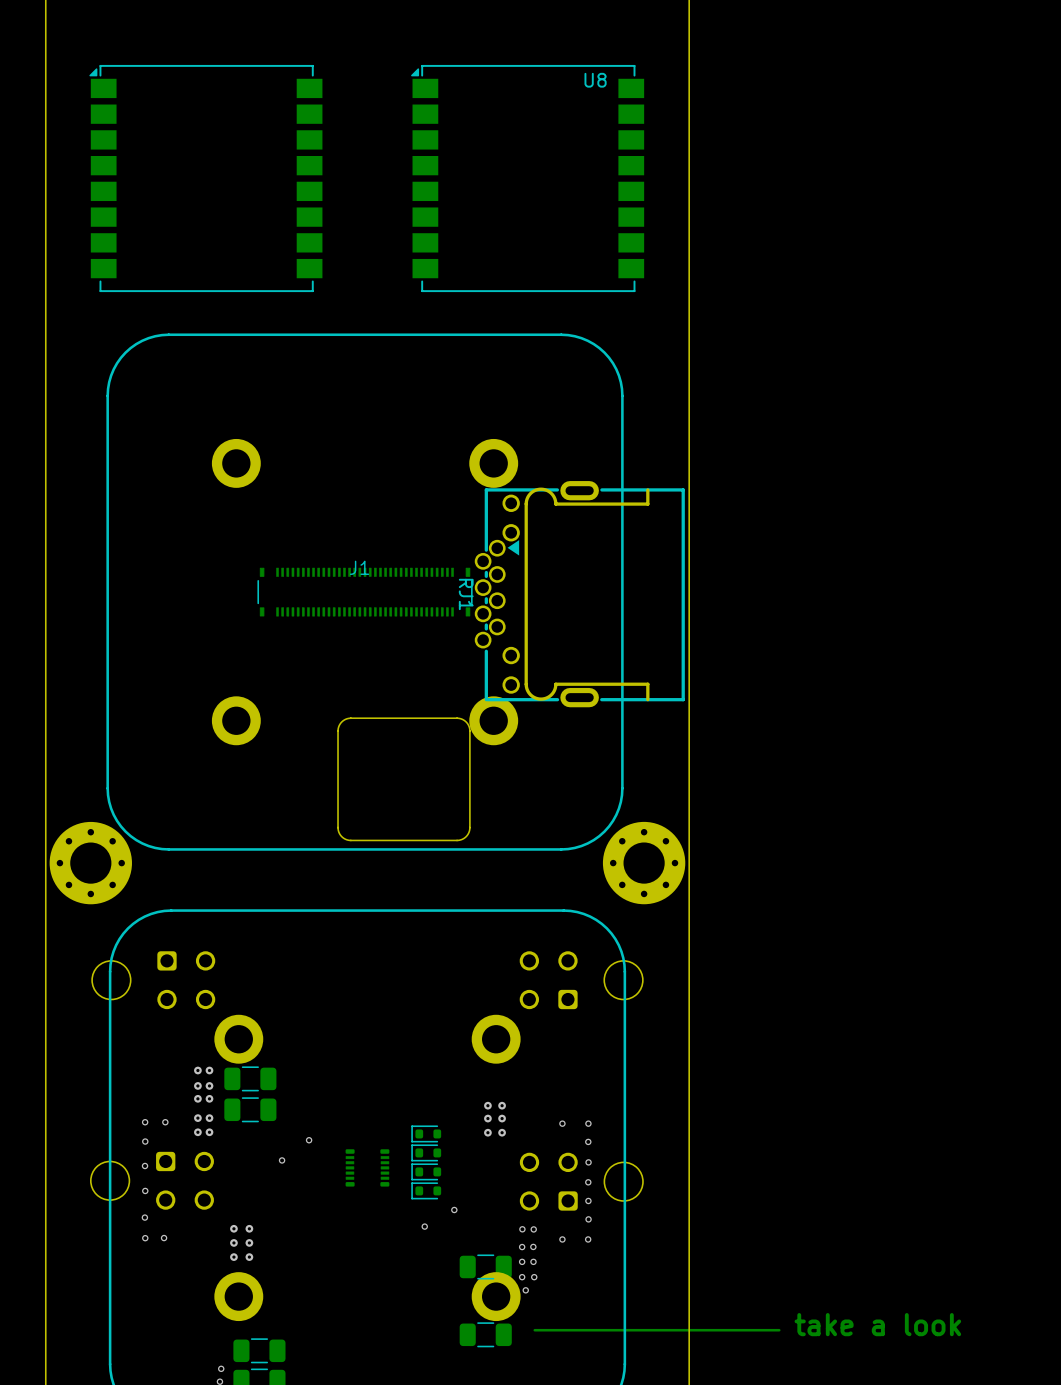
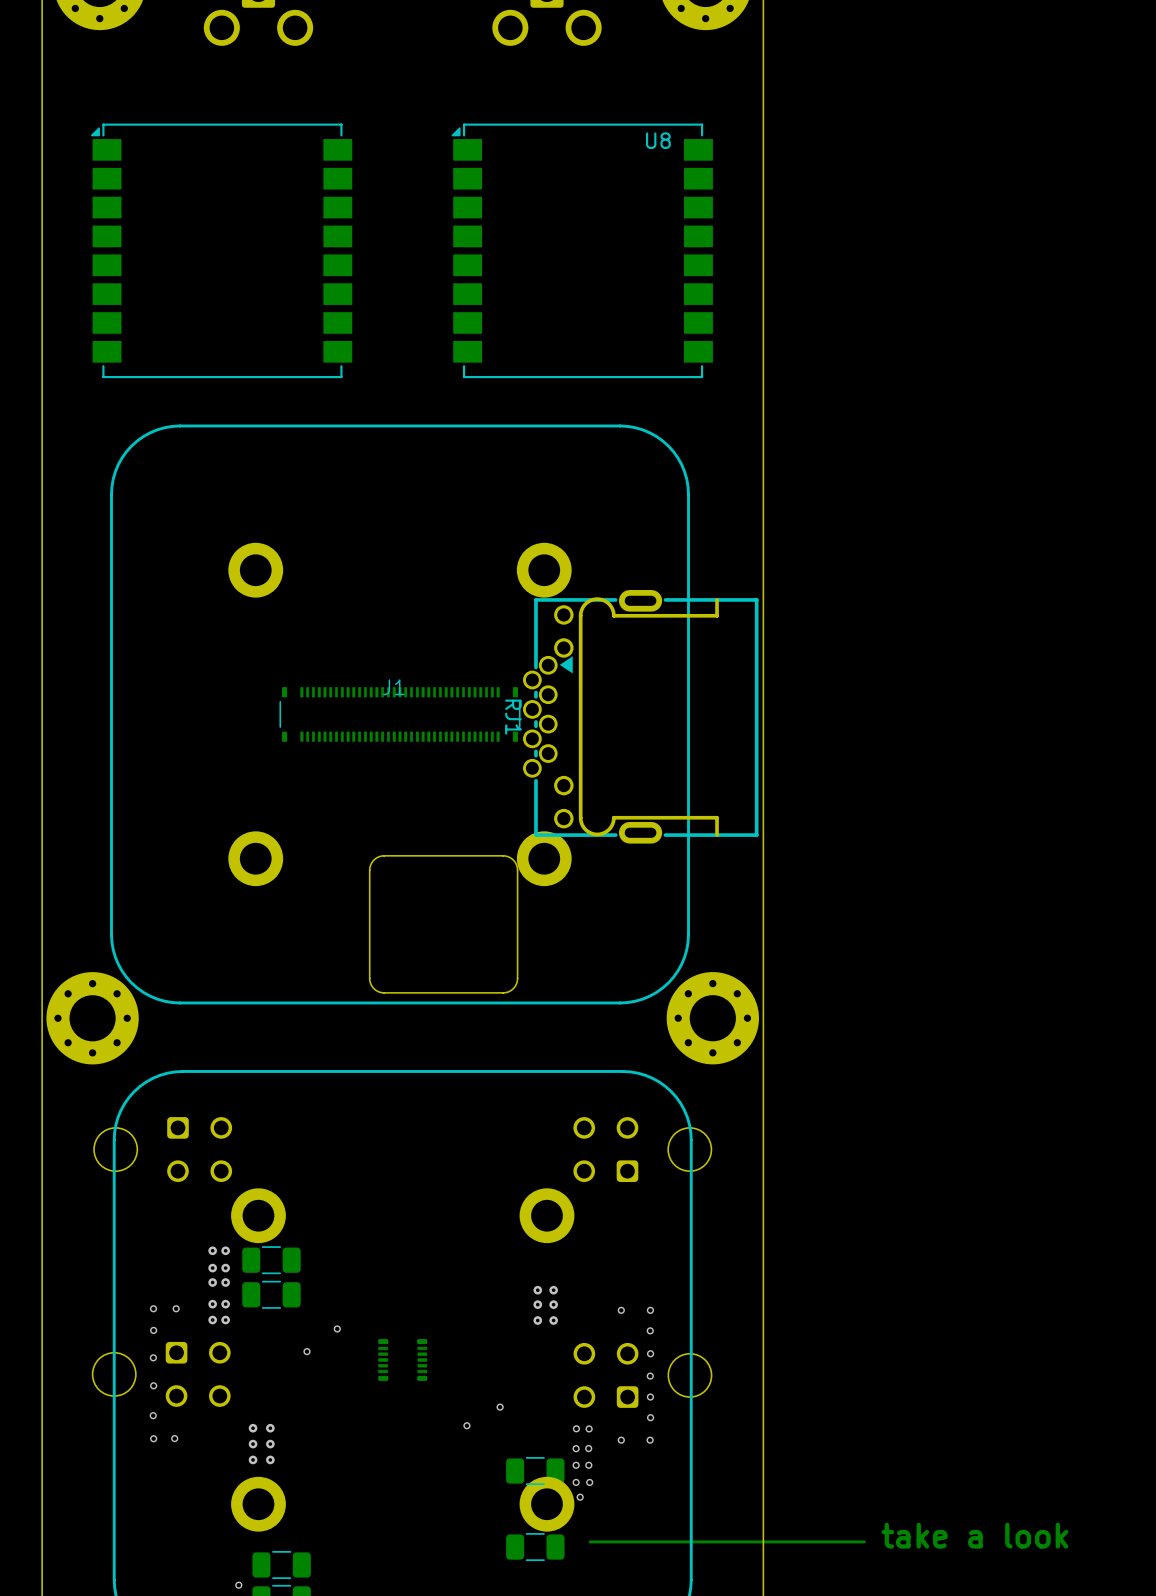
part: (426, 1133) -> none
part: (426, 1152) -> none
part: (426, 1171) -> none
part: (426, 1190) -> none

